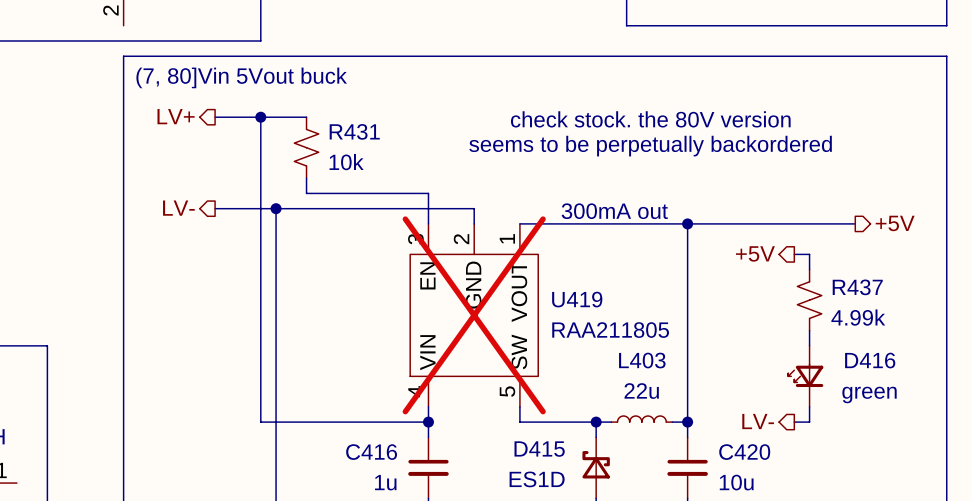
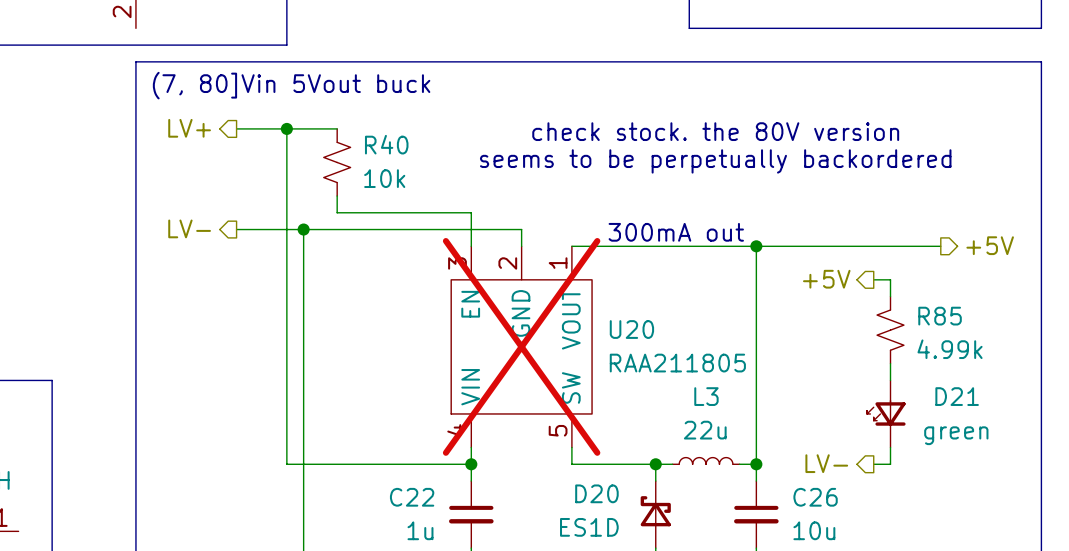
R431 name: R431 (354, 131) -> R40 (386, 144)
R437 name: R437 (857, 287) -> R85 (940, 316)
U419 name: U419 (577, 299) -> U20 (631, 329)
L403 name: L403 (642, 360) -> L3 (706, 396)
D416 name: D416 (870, 360) -> D21 (957, 396)
D415 name: D415 (539, 449) -> D20 (596, 493)
C416 name: C416 (371, 452) -> C22 (412, 497)
C420 name: C420 (744, 452) -> C26 (815, 497)

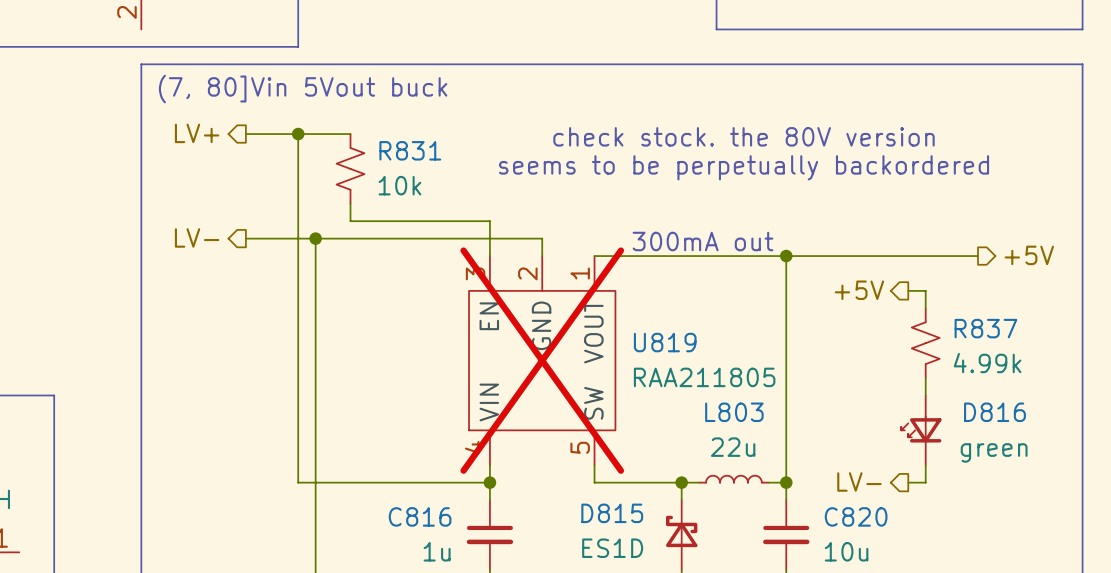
R40 name: R40 (386, 144) -> R831 (410, 150)
R85 name: R85 (940, 316) -> R837 (985, 328)
U20 name: U20 (631, 329) -> U819 (665, 342)
L3 name: L3 (706, 396) -> L803 (734, 412)
D21 name: D21 (957, 396) -> D816 (994, 412)
D20 name: D20 (596, 493) -> D815 (612, 513)
C22 name: C22 (412, 497) -> C816 (420, 516)
C26 name: C26 (815, 497) -> C820 (856, 516)

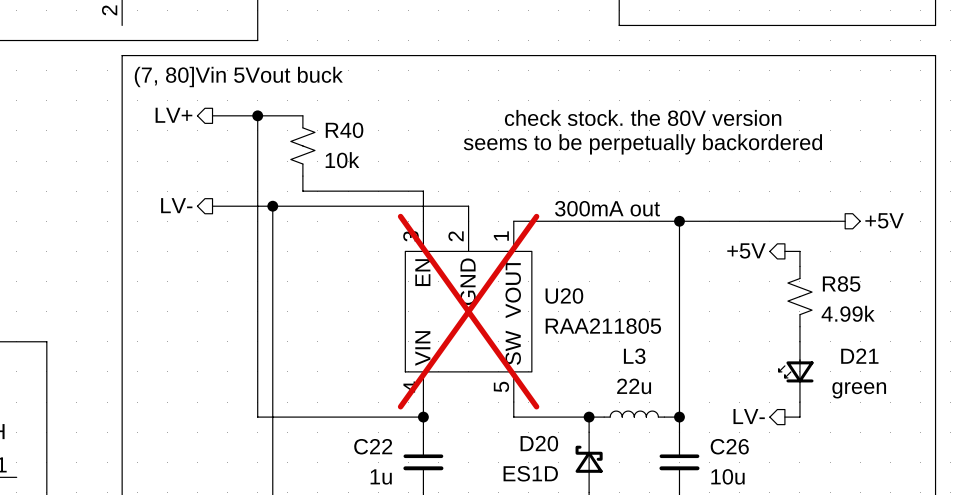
R831 name: R831 (410, 150) -> R40 (344, 130)
R837 name: R837 (985, 328) -> R85 (841, 283)
U819 name: U819 (665, 342) -> U20 (564, 296)
L803 name: L803 (734, 412) -> L3 (634, 356)
D816 name: D816 (994, 412) -> D21 (859, 356)
D815 name: D815 (612, 513) -> D20 (539, 443)
C816 name: C816 (420, 516) -> C22 (373, 446)
C820 name: C820 (856, 516) -> C26 (729, 446)

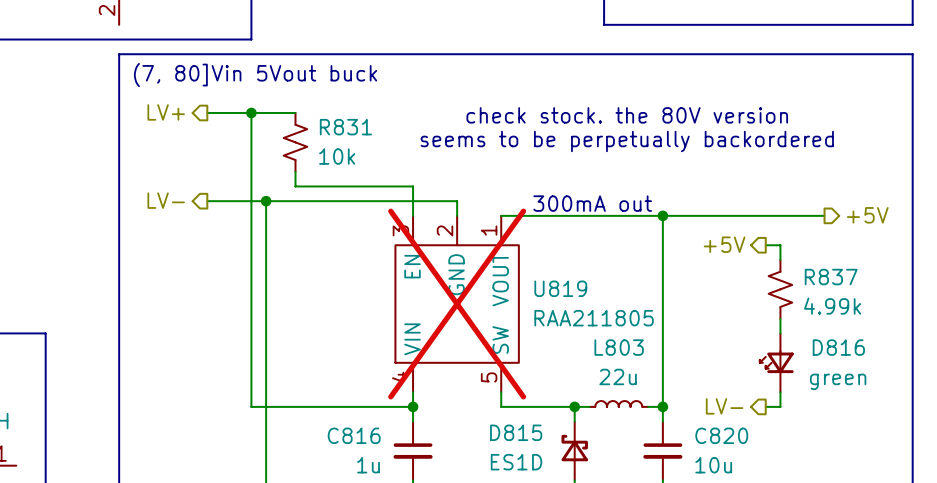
R40 name: R40 (344, 130) -> R831 (345, 127)
R85 name: R85 (841, 283) -> R837 (831, 277)
U20 name: U20 (564, 296) -> U819 (560, 288)
L3 name: L3 (634, 356) -> L803 (619, 347)
D21 name: D21 (859, 356) -> D816 (838, 347)
D20 name: D20 (539, 443) -> D815 (516, 432)
C22 name: C22 (373, 446) -> C816 (354, 435)
C26 name: C26 (729, 446) -> C820 (721, 435)

